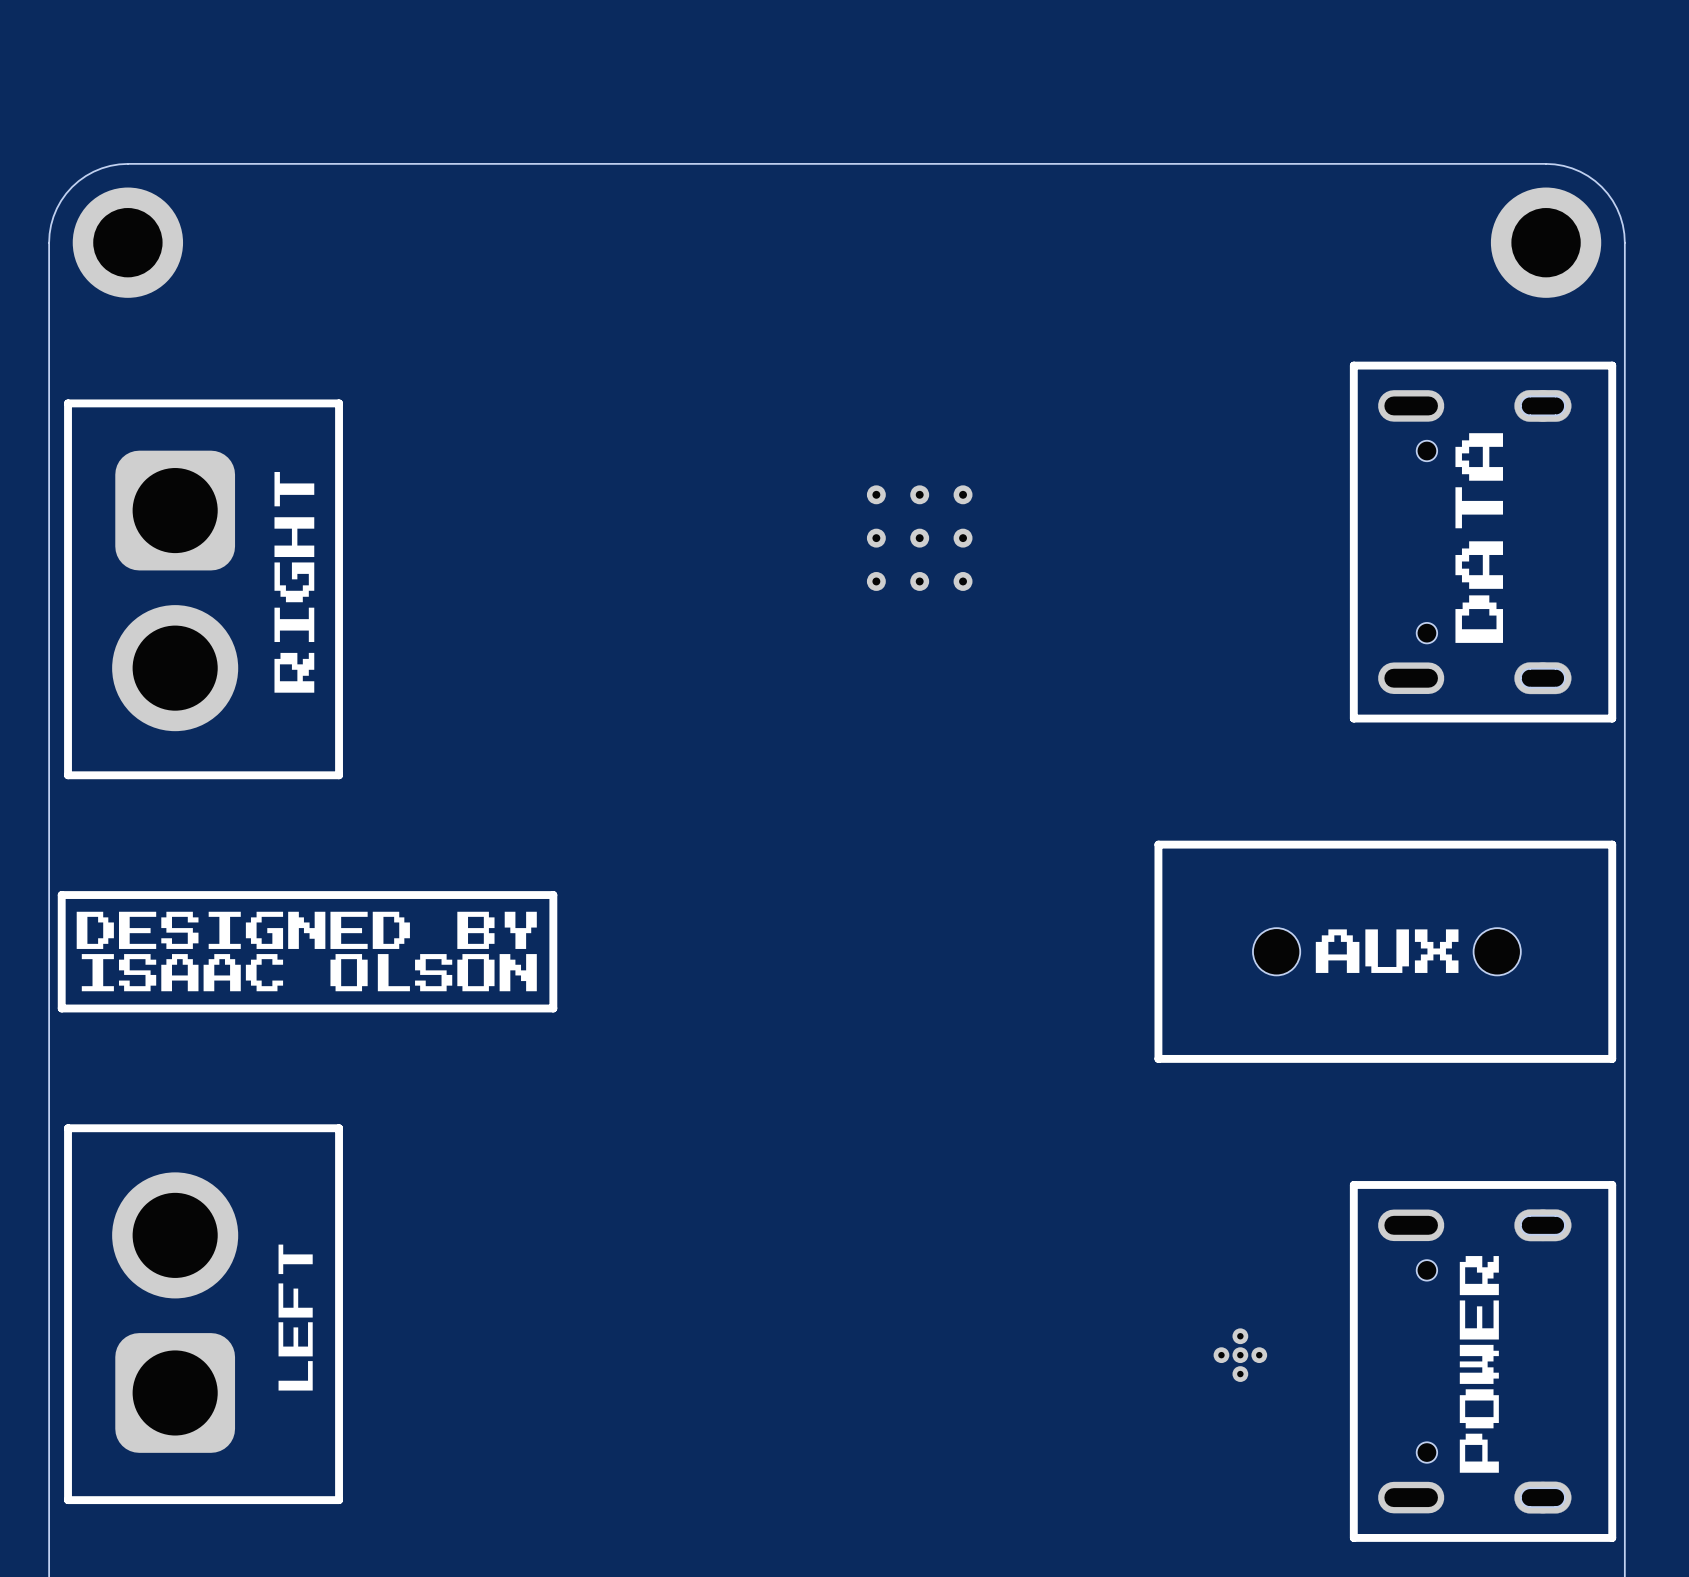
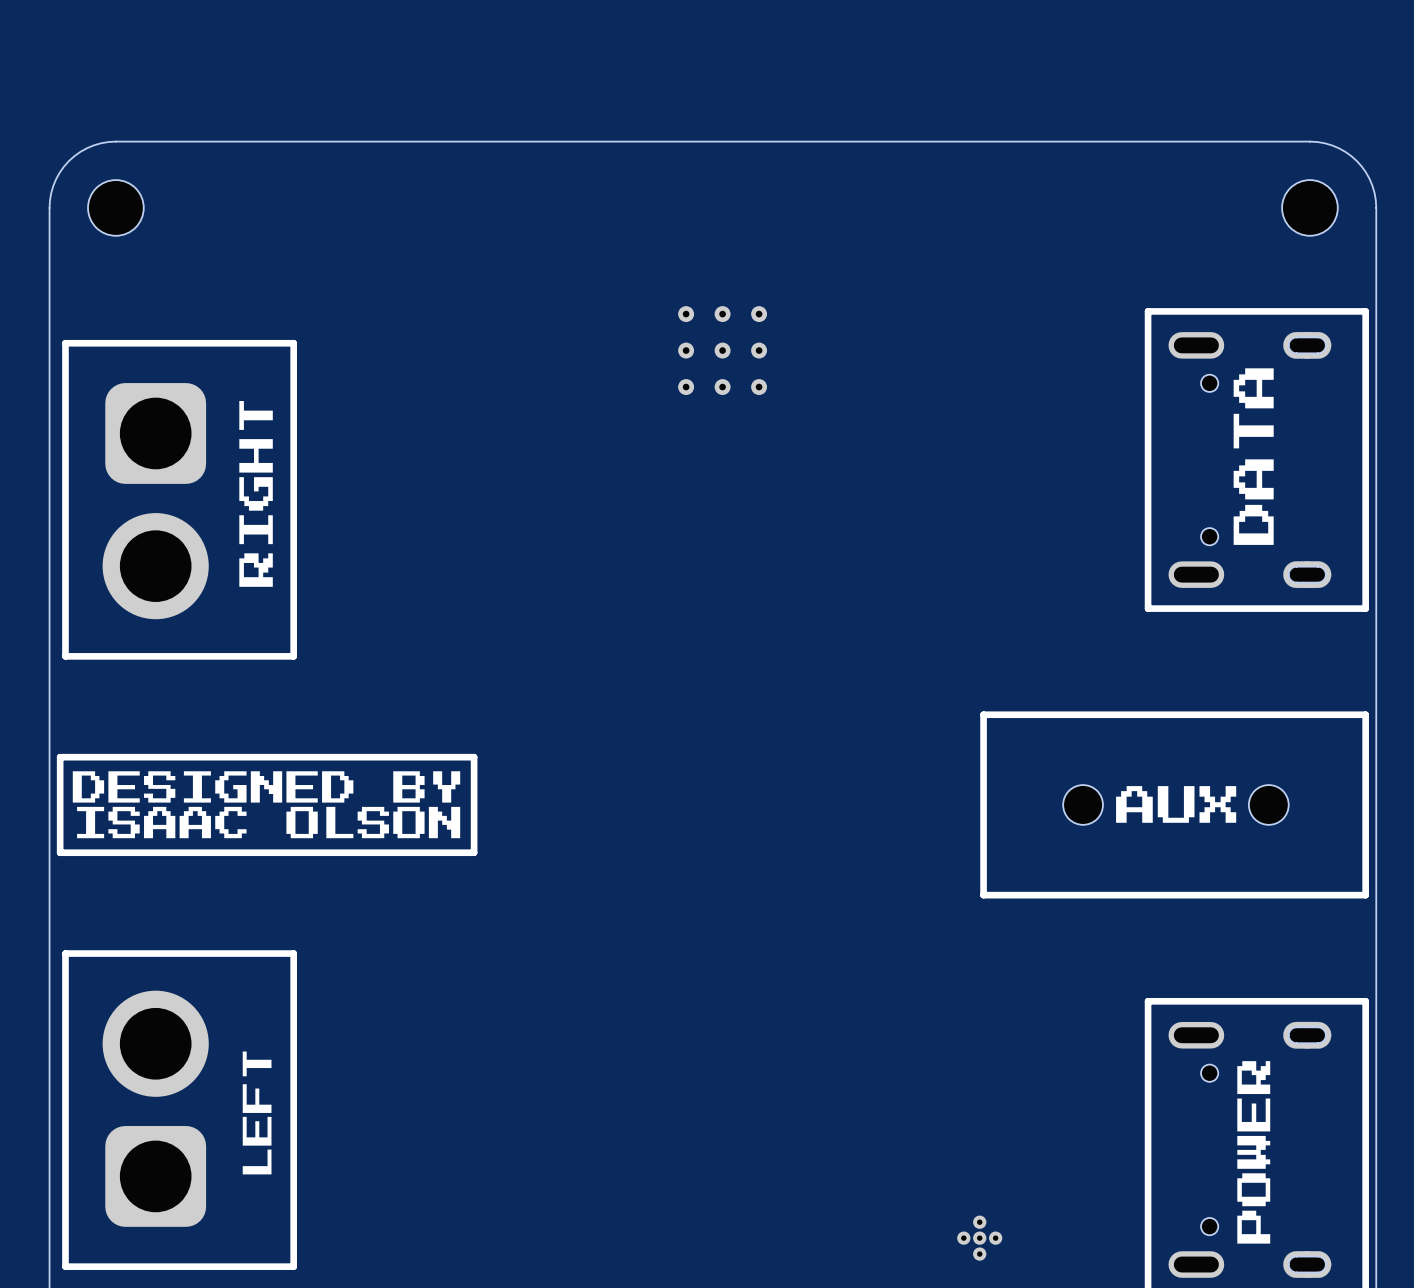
part footprint: [72, 187, 184, 298] -> [88, 180, 144, 236]
part footprint: [1490, 187, 1602, 298] -> [1282, 180, 1338, 236]
part position: (919, 538) -> (722, 350)
part position: (1240, 1355) -> (979, 1238)

